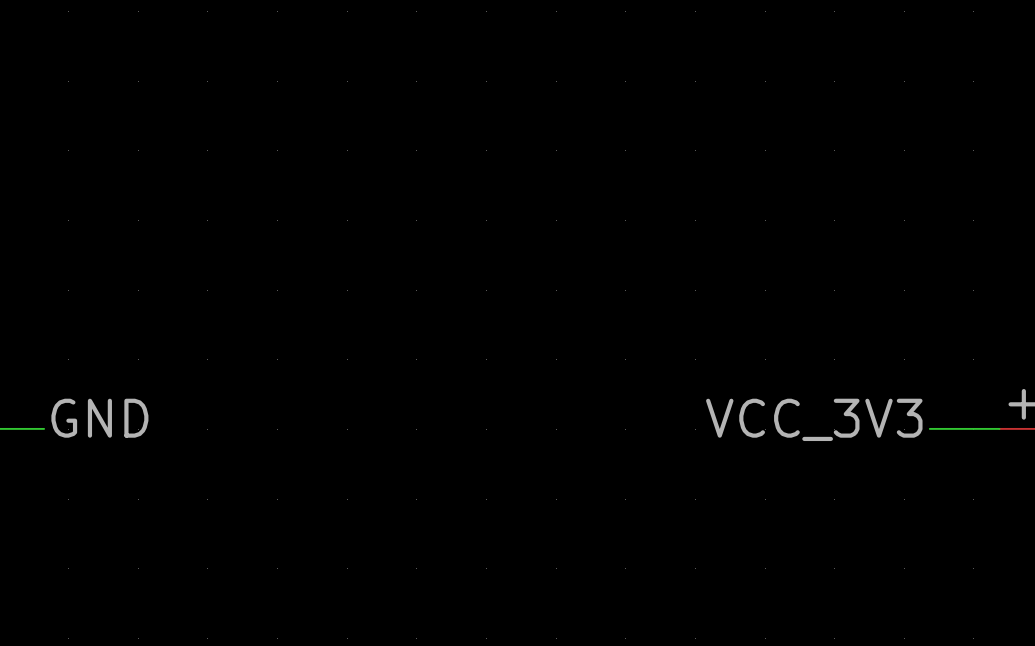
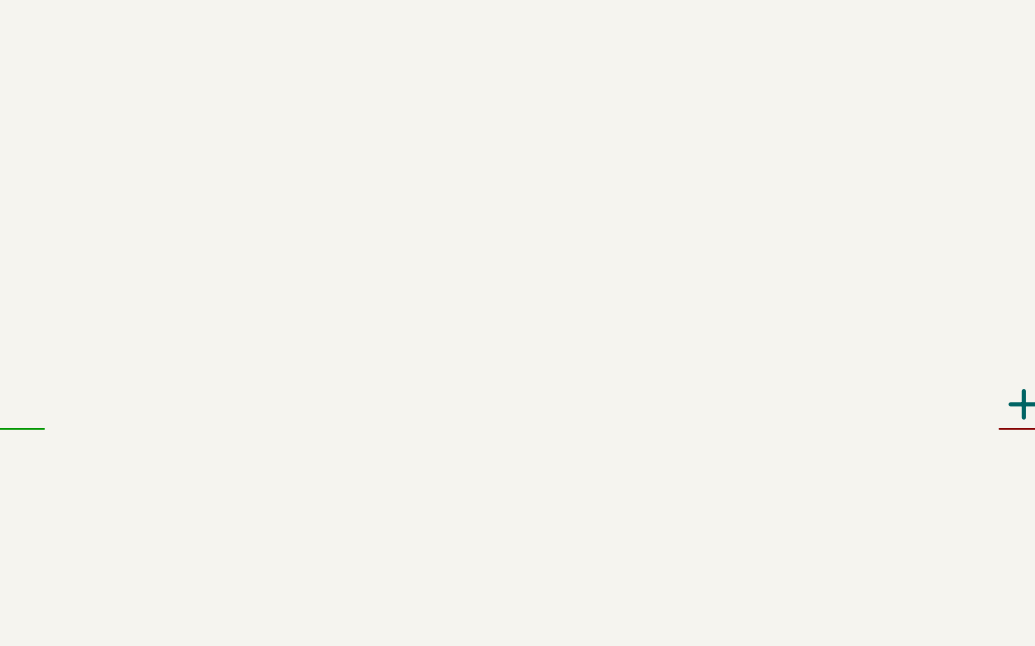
label: GND (99, 418) -> none
label: VCC_3V3 (814, 419) -> none
wire: (929, 428) (999, 428) -> none

